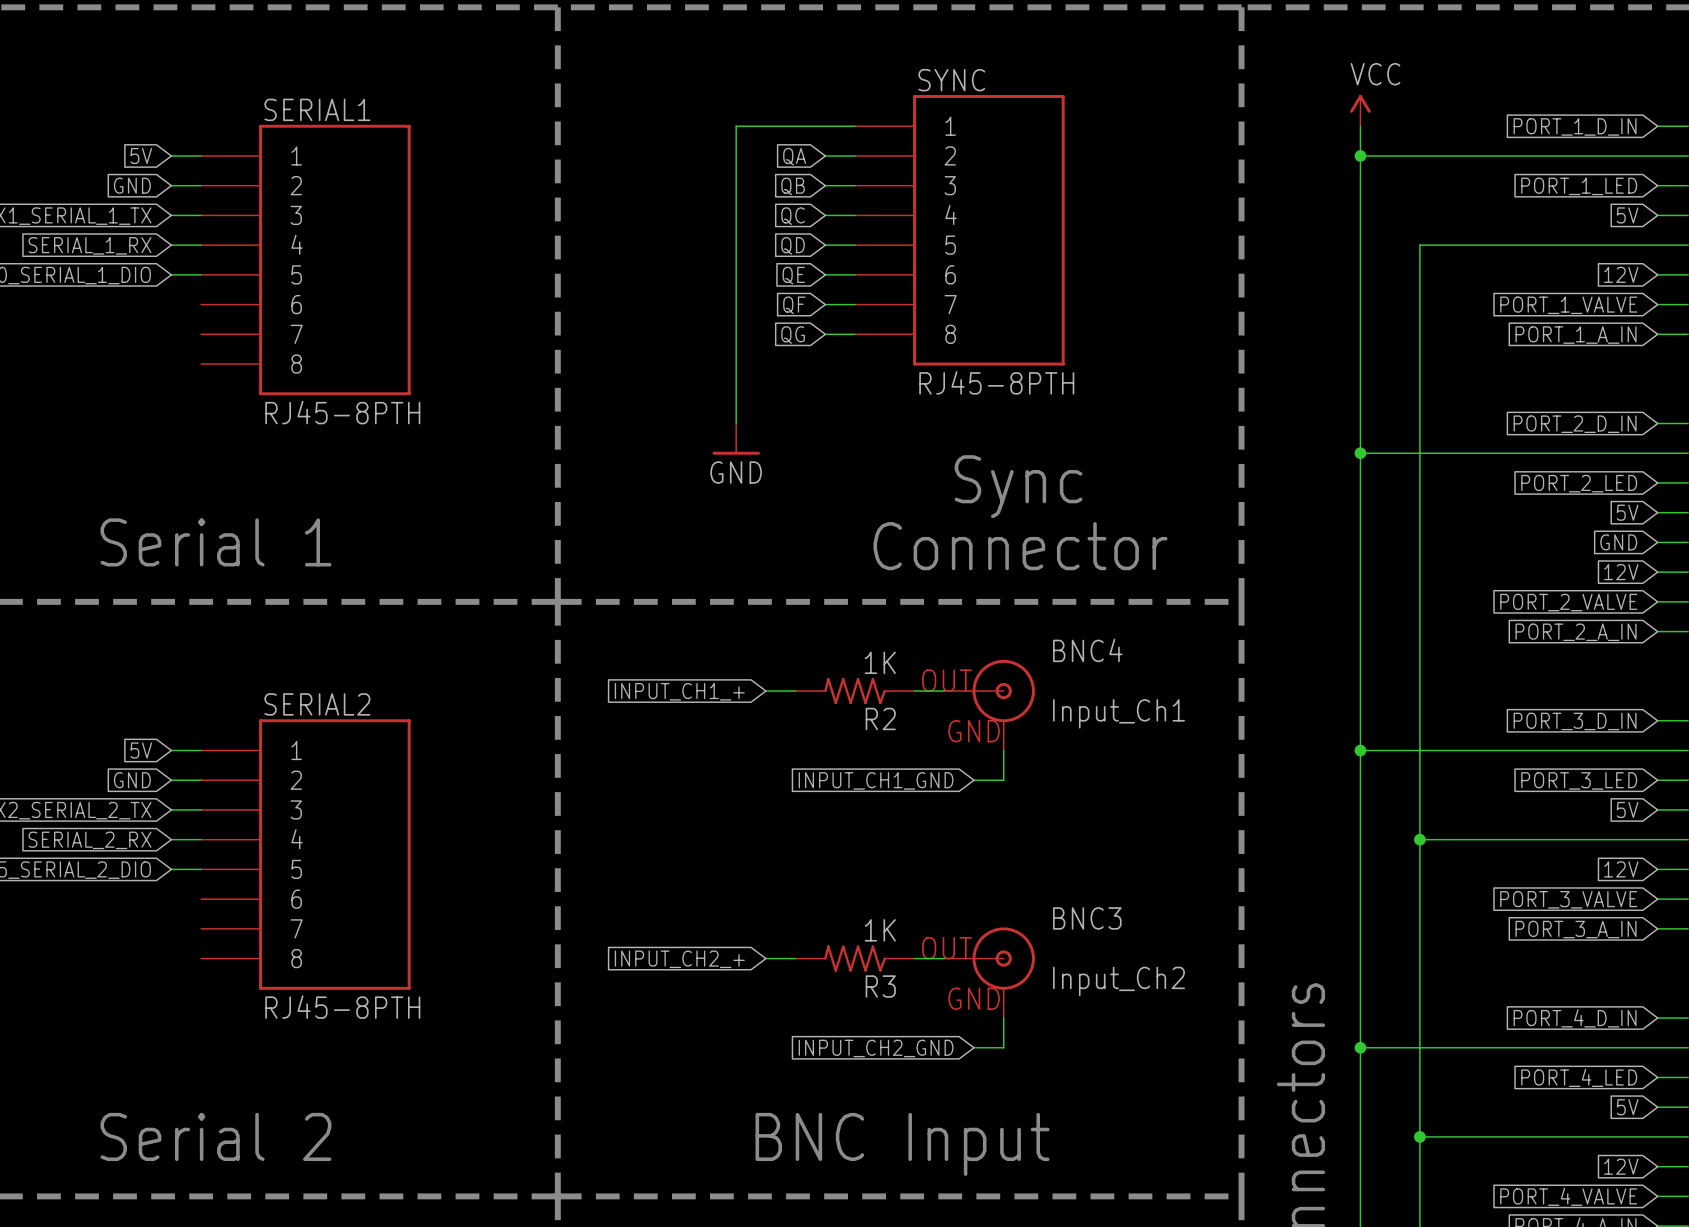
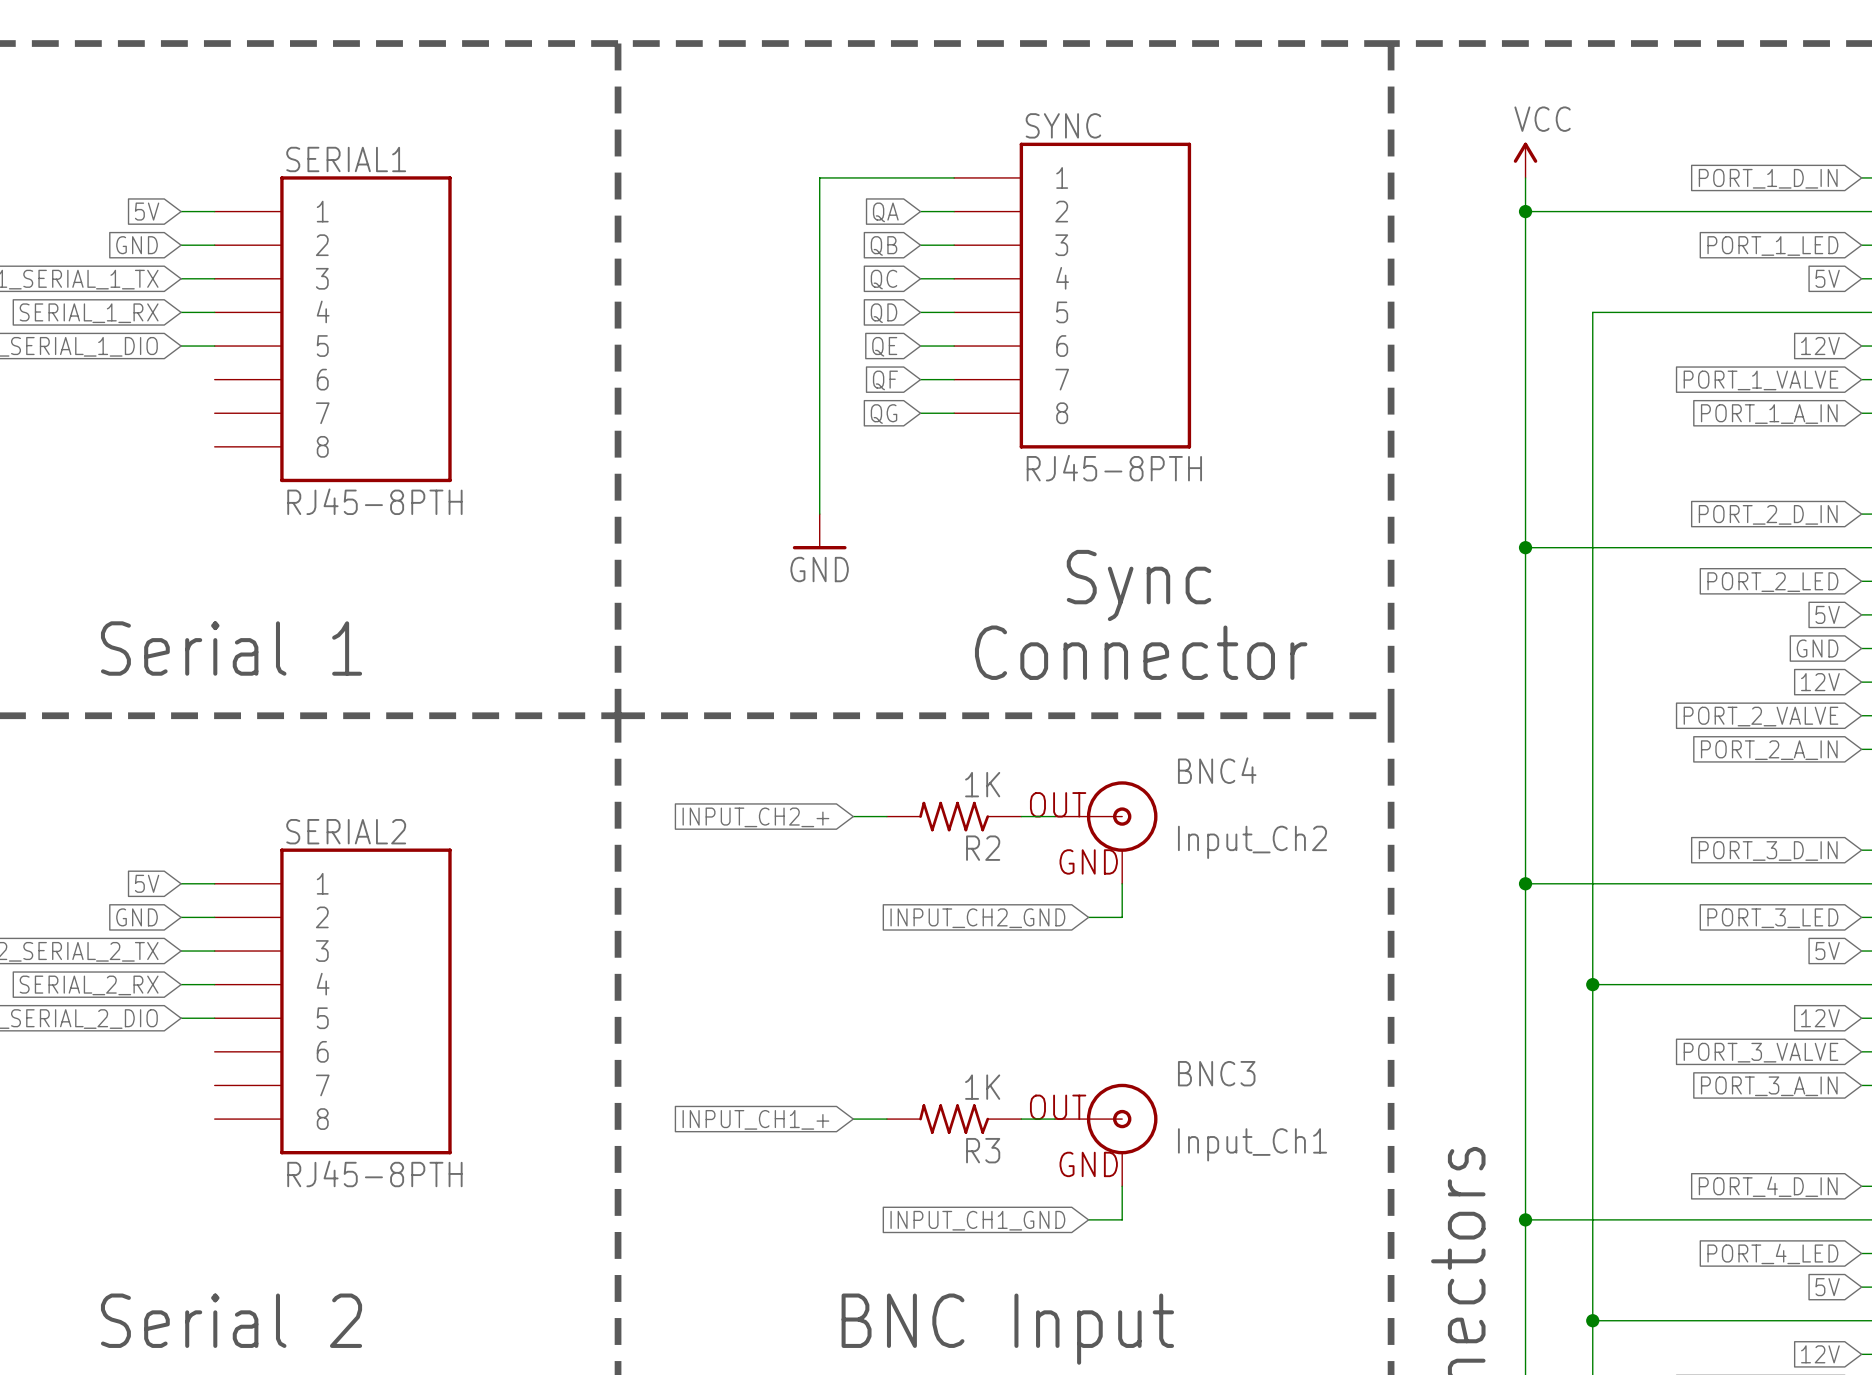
global label: INPUT_CH1_+ (679, 691) -> INPUT_CH2_+ (755, 817)
BNC4 value: Input_Ch1 (1118, 713) -> Input_Ch2 (1252, 842)
global label: INPUT_CH1_GND (876, 780) -> INPUT_CH2_GND (977, 918)
global label: INPUT_CH2_+ (679, 959) -> INPUT_CH1_+ (755, 1119)
BNC3 value: Input_Ch2 (1118, 981) -> Input_Ch1 (1252, 1144)
global label: INPUT_CH2_GND (876, 1048) -> INPUT_CH1_GND (977, 1220)

